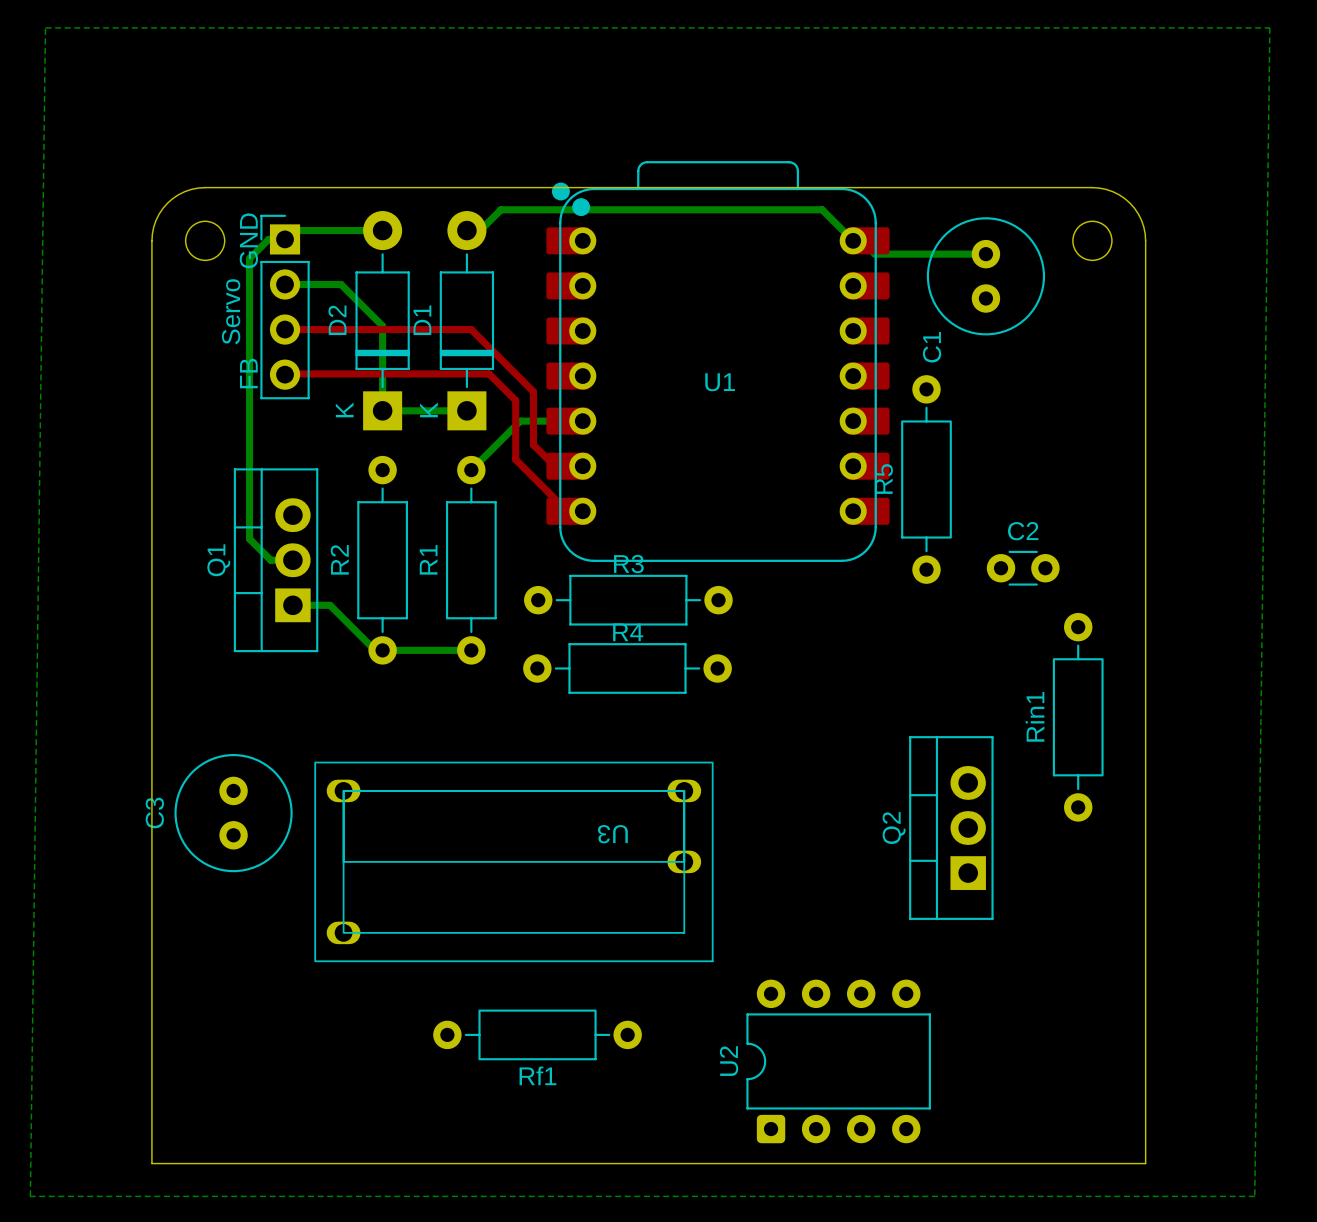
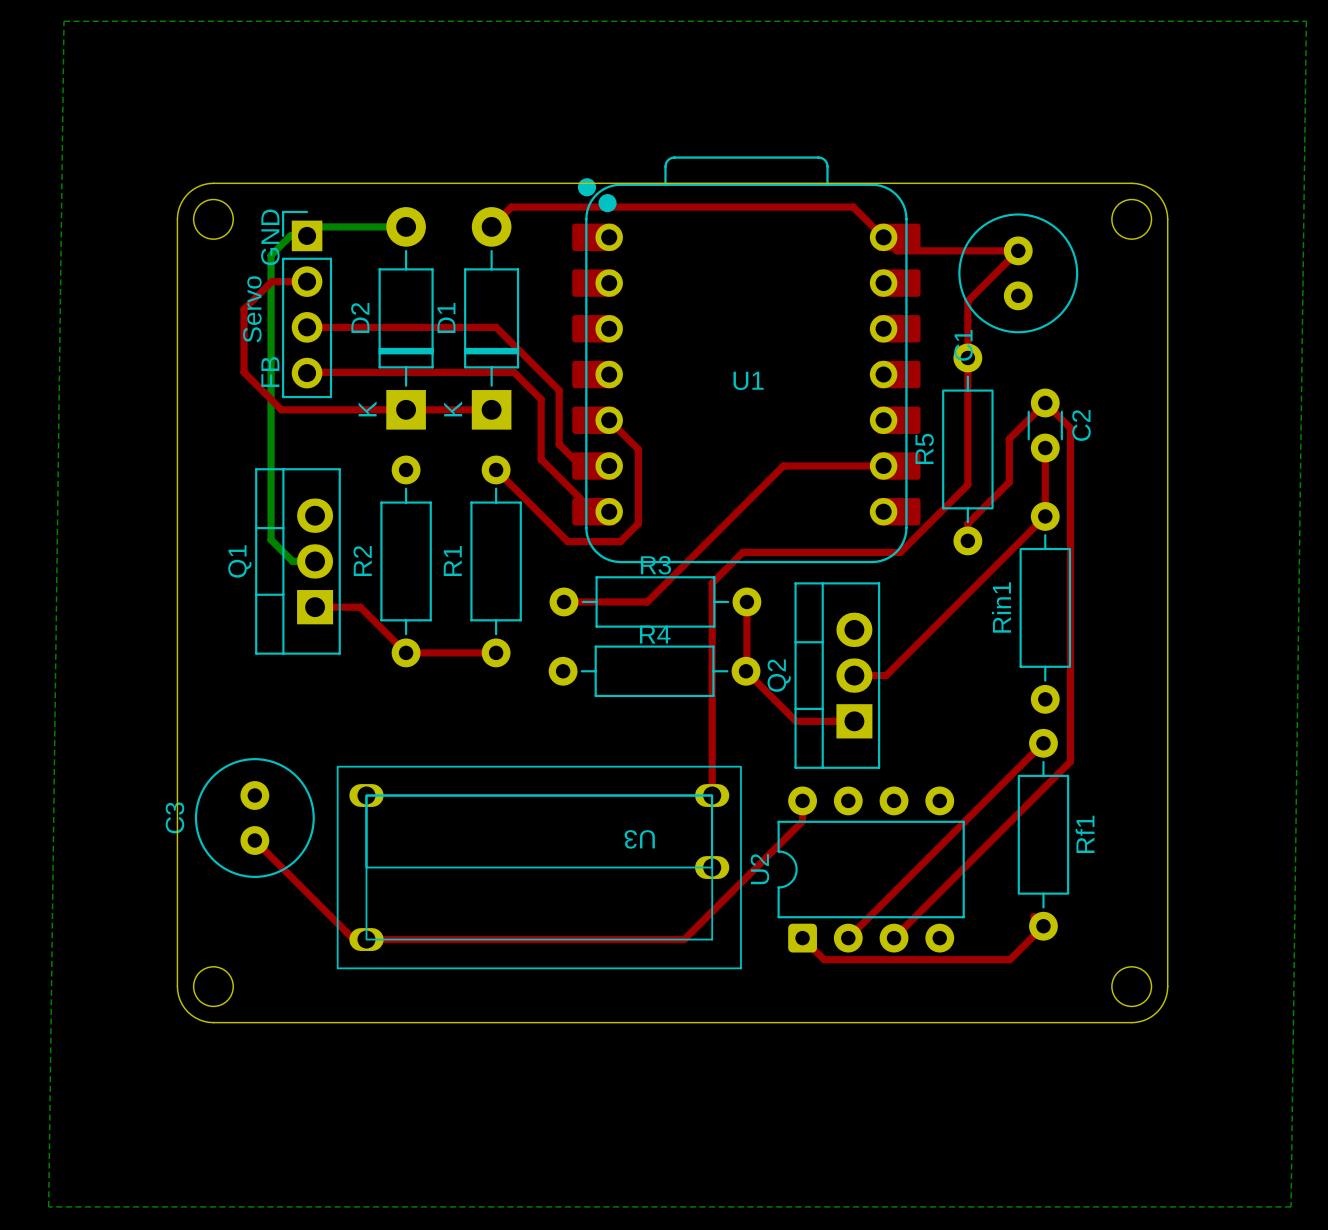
board edge: (205, 187) (184, 191) (167, 203) (155, 220) (151, 240) (151, 1163) (1145, 1163) (1145, 240) (1141, 220) (1130, 203) (1112, 191) (1092, 187) -> (226, 183) (205, 184) (190, 191) (180, 203) (177, 219) (177, 986) (180, 1000) (187, 1012) (199, 1019) (213, 1022) (1131, 1022) (1143, 1020) (1157, 1012) (1164, 1002) (1167, 986) (1167, 219) (1164, 205) (1153, 190) (1141, 184) (1126, 183)
top track: none -> (491, 226) (511, 207) (853, 207) (897, 250) (1018, 250) (967, 301) (967, 484) (900, 552) (742, 552) (712, 583) (712, 795)
bottom track: (480, 230) (500, 209) (822, 209) (853, 240) -> none
round board edge position: (205, 240) -> (213, 219)
round board edge position: (1092, 240) -> (1131, 219)
bottom track: (875, 254) (985, 254) -> none
bottom track: (285, 284) (341, 284) (382, 326) (382, 401) -> none
top track: none -> (307, 281) (271, 281) (244, 309) (244, 372) (281, 409) (491, 409)
top track: none -> (1045, 402) (1070, 428) (1070, 761) (894, 938)
top track: none -> (1045, 402) (1009, 439) (1009, 482) (967, 523) (967, 540)
bottom track: (382, 410) (466, 410) -> none
bottom track: (582, 421) (520, 421) (471, 470) -> none
top track: none -> (609, 420) (638, 449) (638, 523) (620, 541) (567, 541) (496, 469)
top track: none -> (1045, 448) (1045, 516) (886, 675) (854, 675)
top track: none -> (883, 466) (783, 466) (647, 601) (564, 601)
R5 position: (926, 479) -> (967, 449)
C2 rotation: 0° (1023, 568) -> 90° clockwise (1045, 425)
C2 position: (1023, 568) -> (1045, 425)
top track: none -> (746, 601) (746, 671) (796, 721) (854, 721)
bottom track: (292, 605) (330, 605) (375, 650) -> none
top track: none -> (315, 607) (360, 607) (406, 652) (496, 652)
bottom track: (382, 650) (471, 650) -> none
Rin1 position: (1078, 717) -> (1045, 607)
top track: none -> (1043, 743) (848, 938) (848, 934)
top track: none -> (802, 800) (802, 821) (684, 939) (353, 939) (254, 840)
Q2 position: (951, 828) -> (837, 675)
top track: none -> (1033, 916) (1043, 926) (1009, 959) (824, 959) (802, 938)
round board edge: none -> [193, 966, 234, 1007]
round board edge: none -> [1111, 966, 1152, 1007]
Rf1 rotation: 0° (537, 1034) -> 90° clockwise (1043, 834)
Rf1 position: (537, 1034) -> (1043, 834)
U2 position: (838, 1061) -> (871, 869)
Rf1 name position: Rf1 (537, 1075) -> Rf1 (1085, 834)

